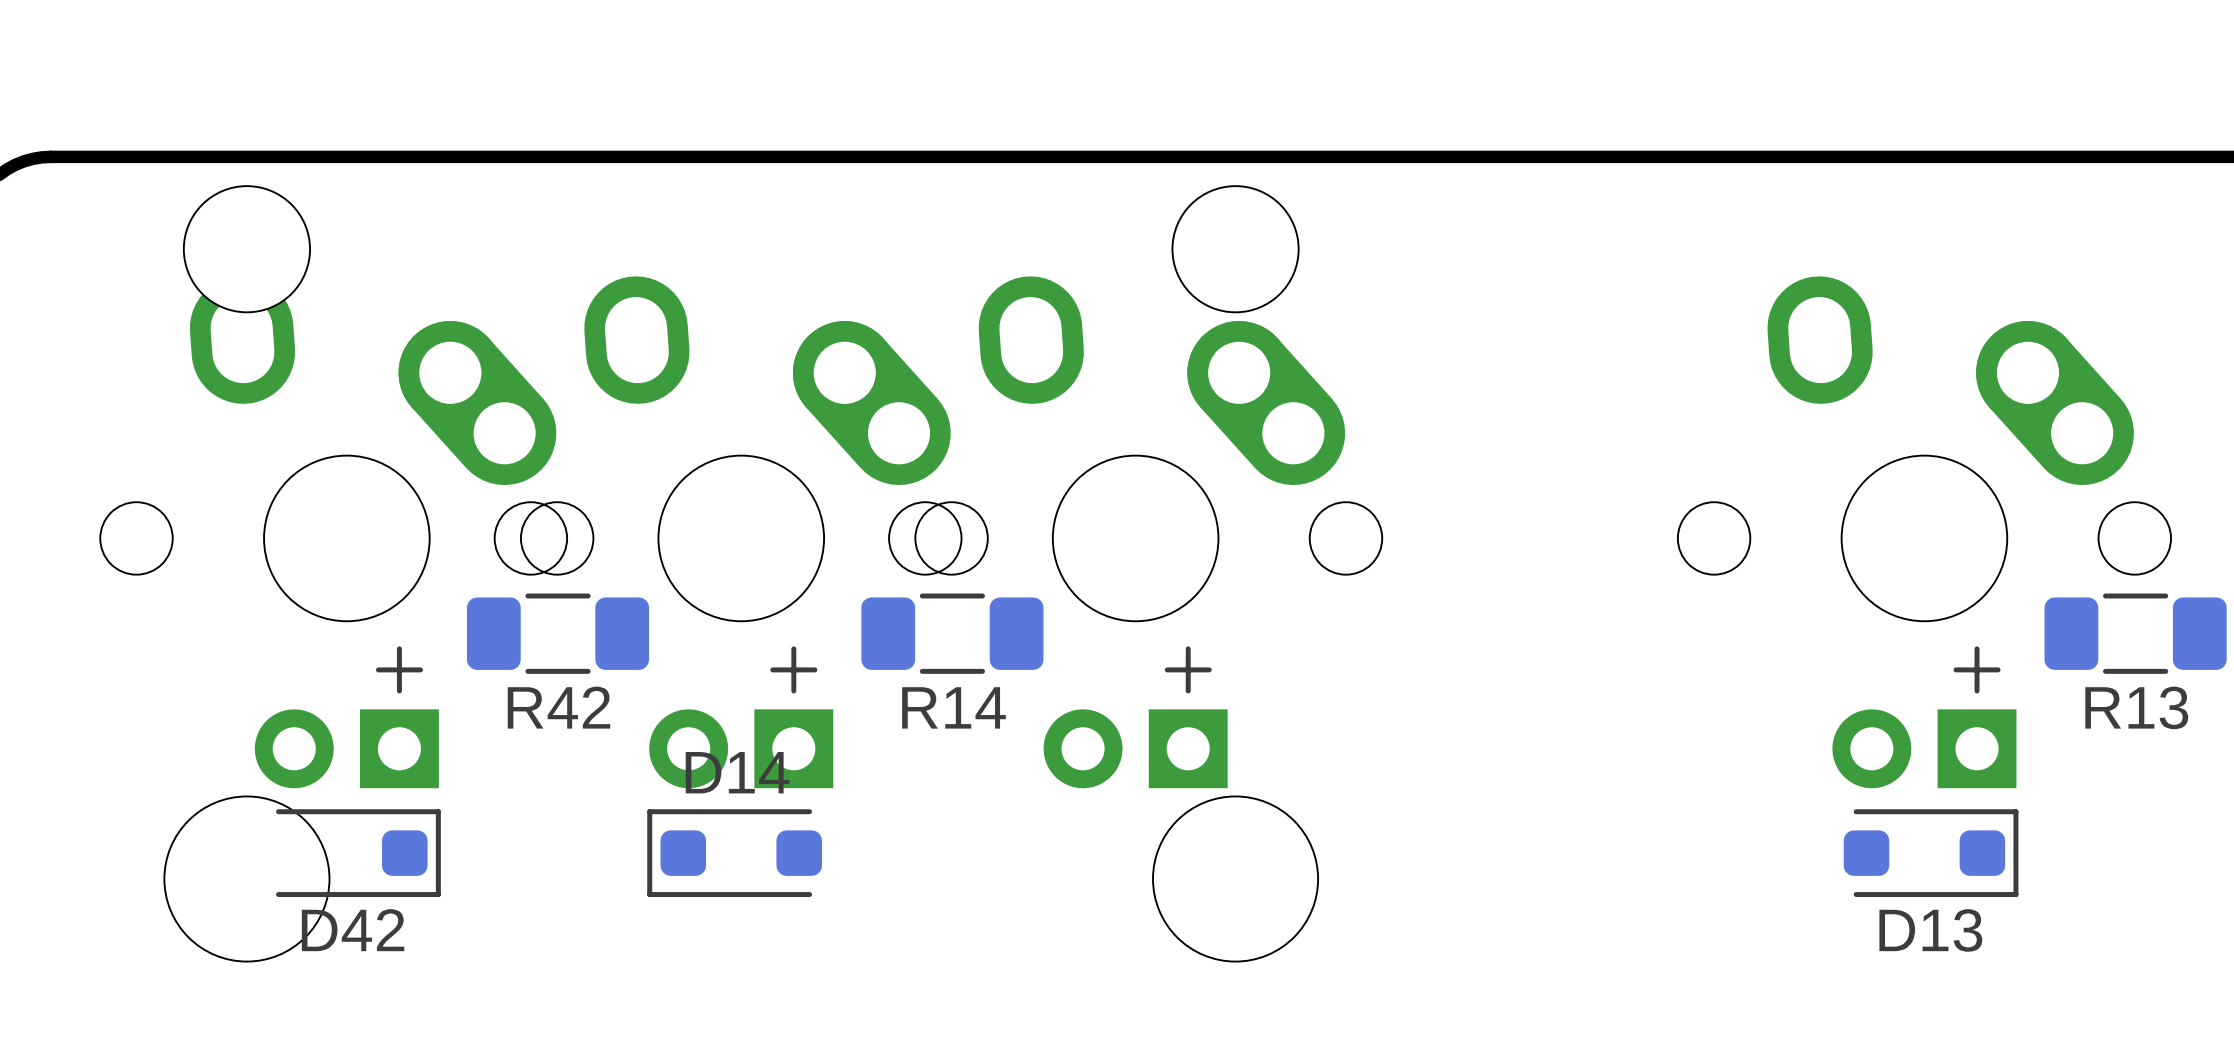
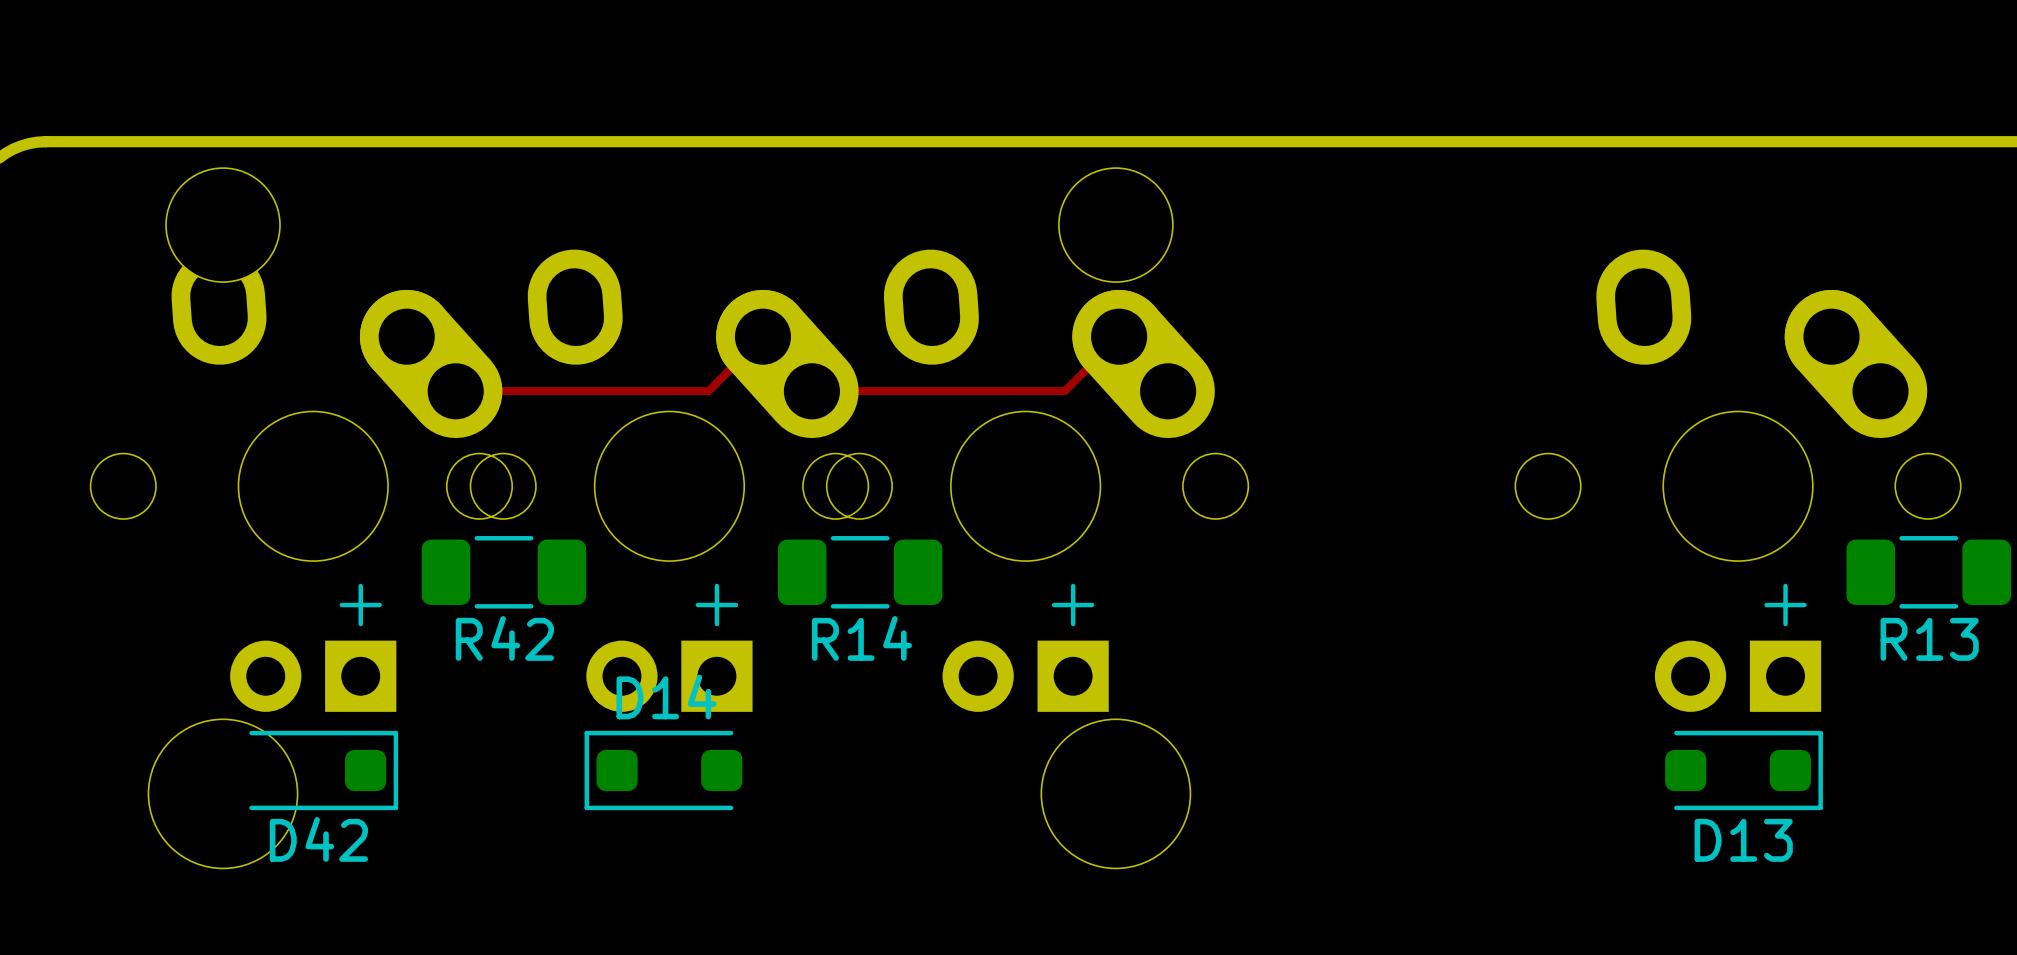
top track: none -> (762, 336) (708, 391) (455, 391)
top track: none -> (1119, 336) (1064, 391) (811, 391)

